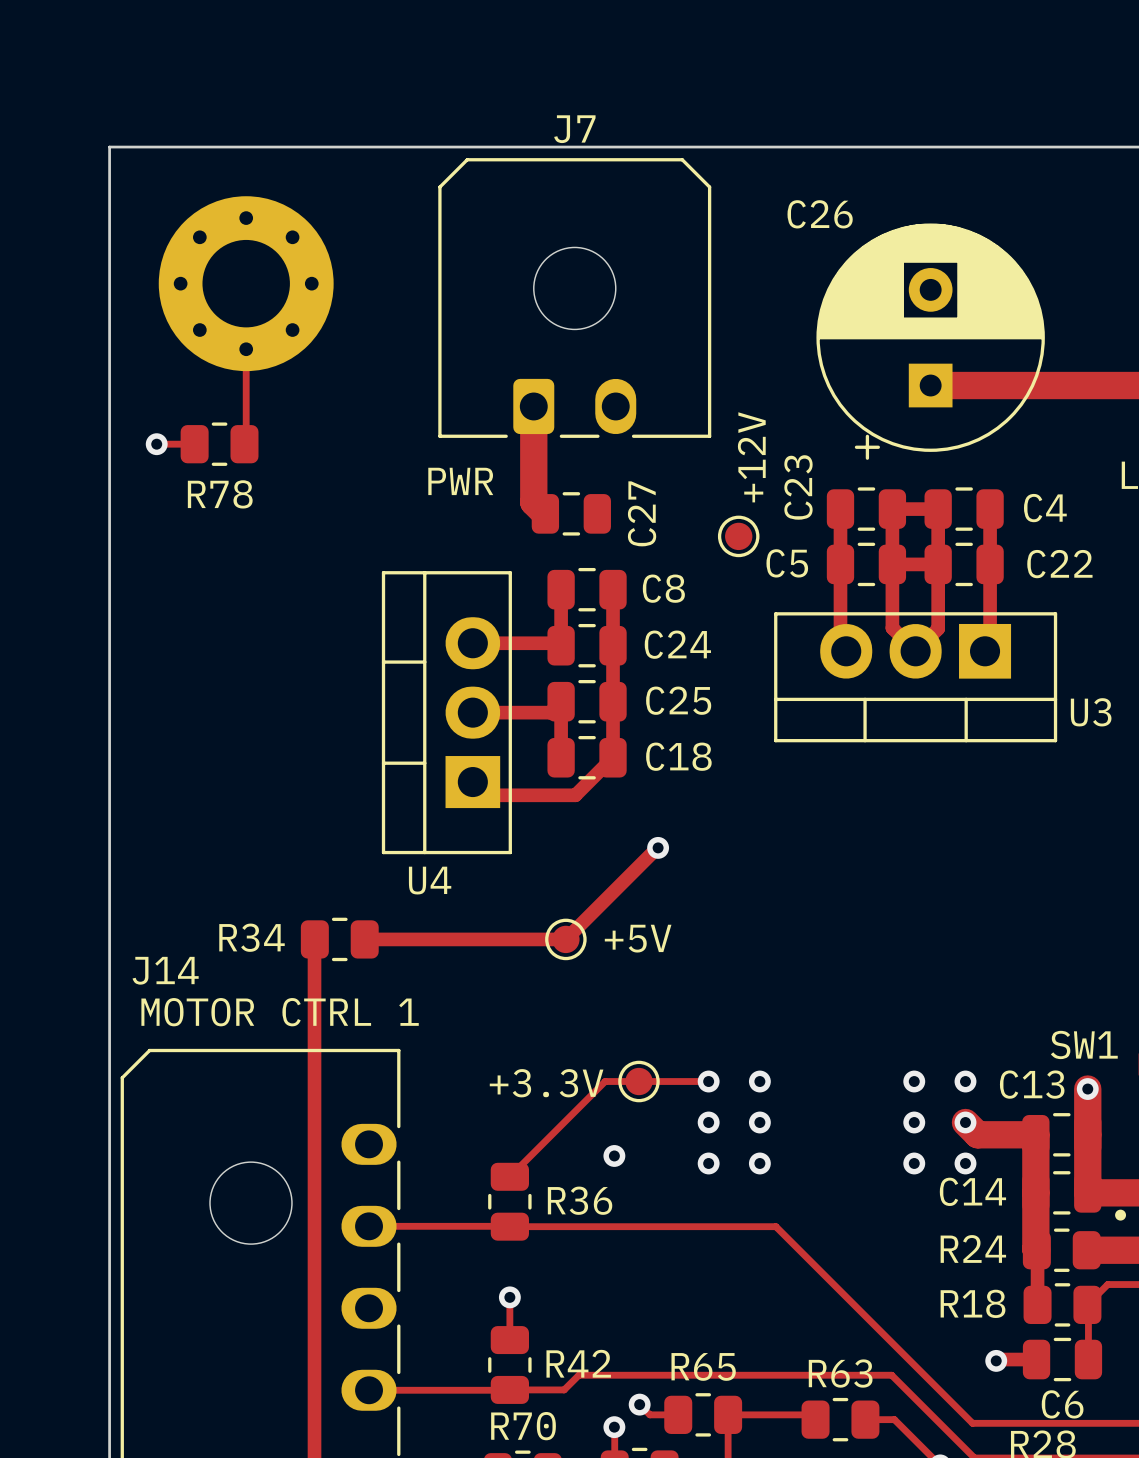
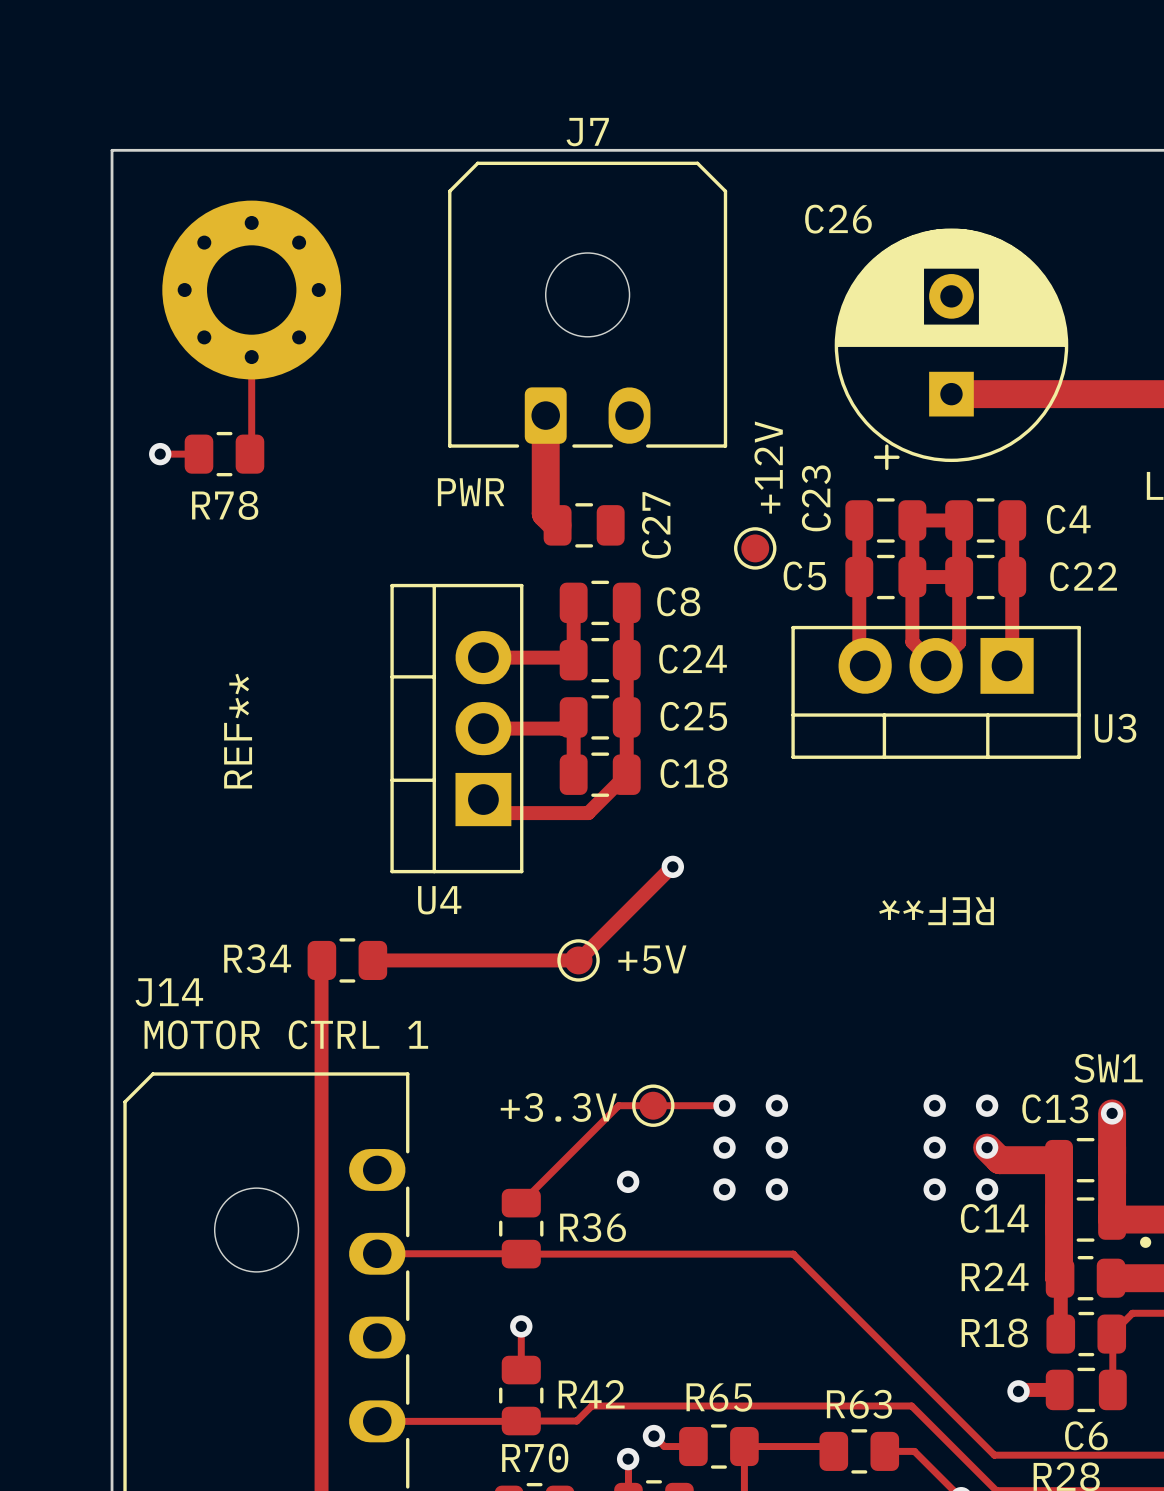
REF**: none -> (238, 731)
REF**: none -> (936, 911)

